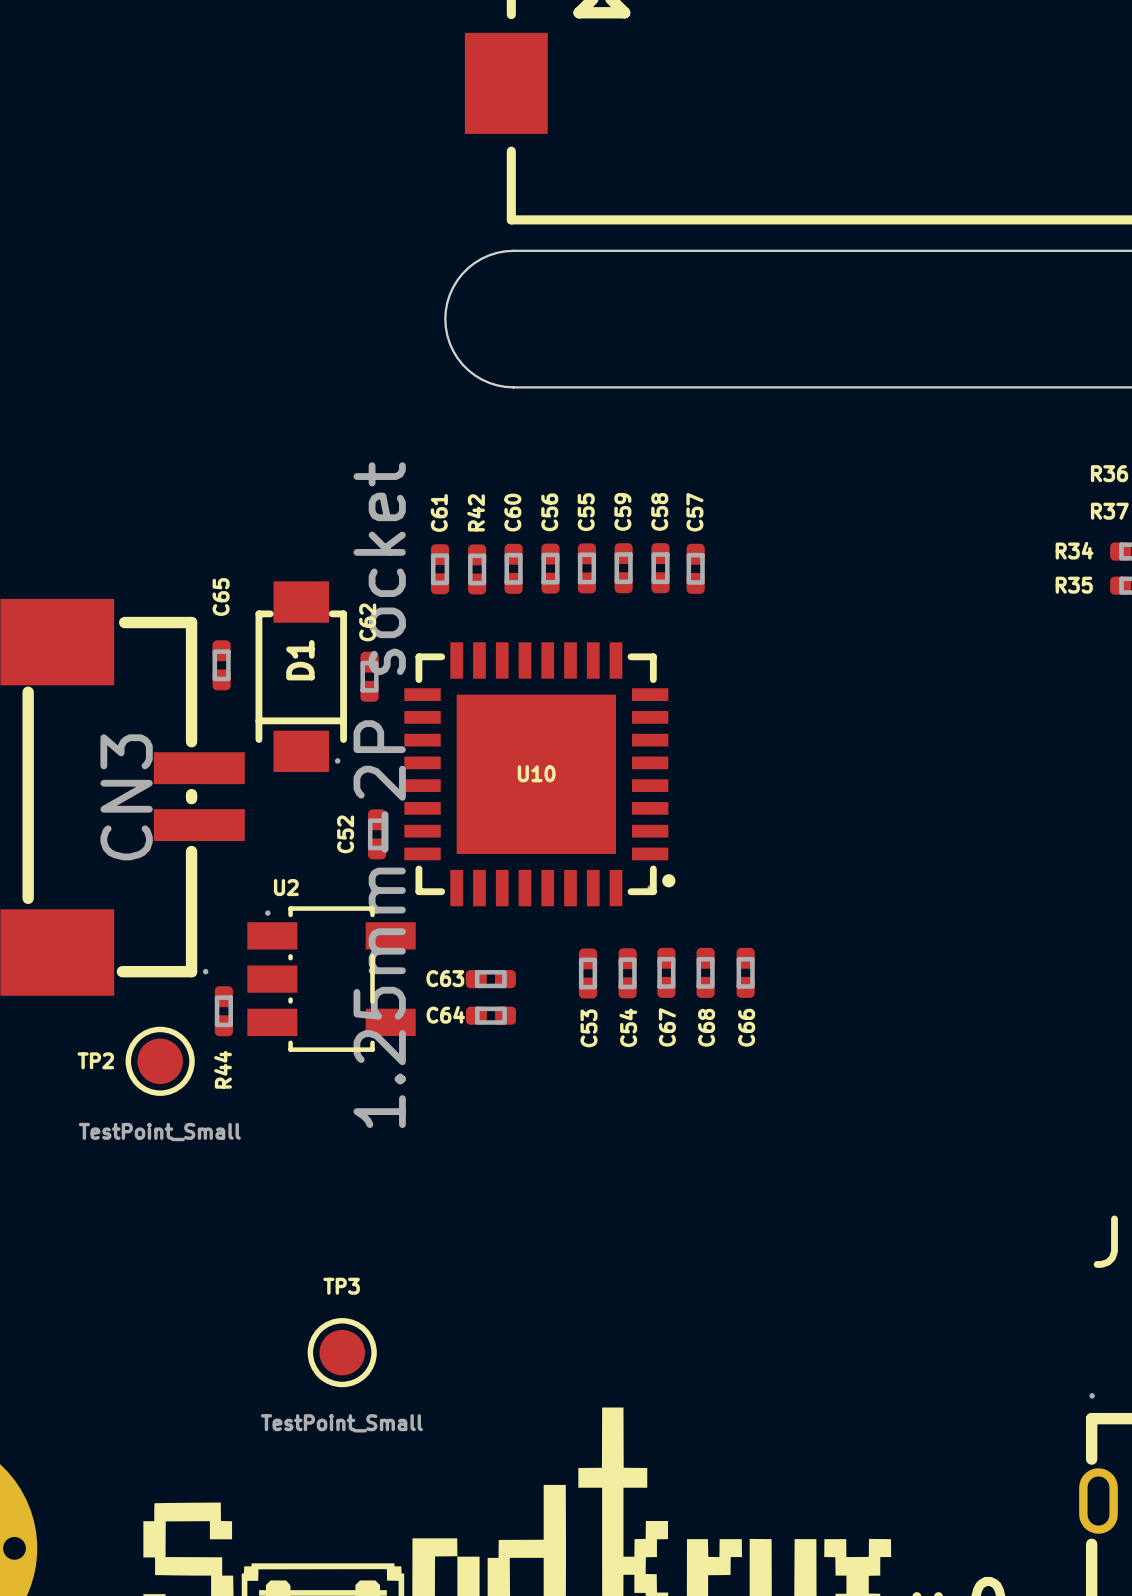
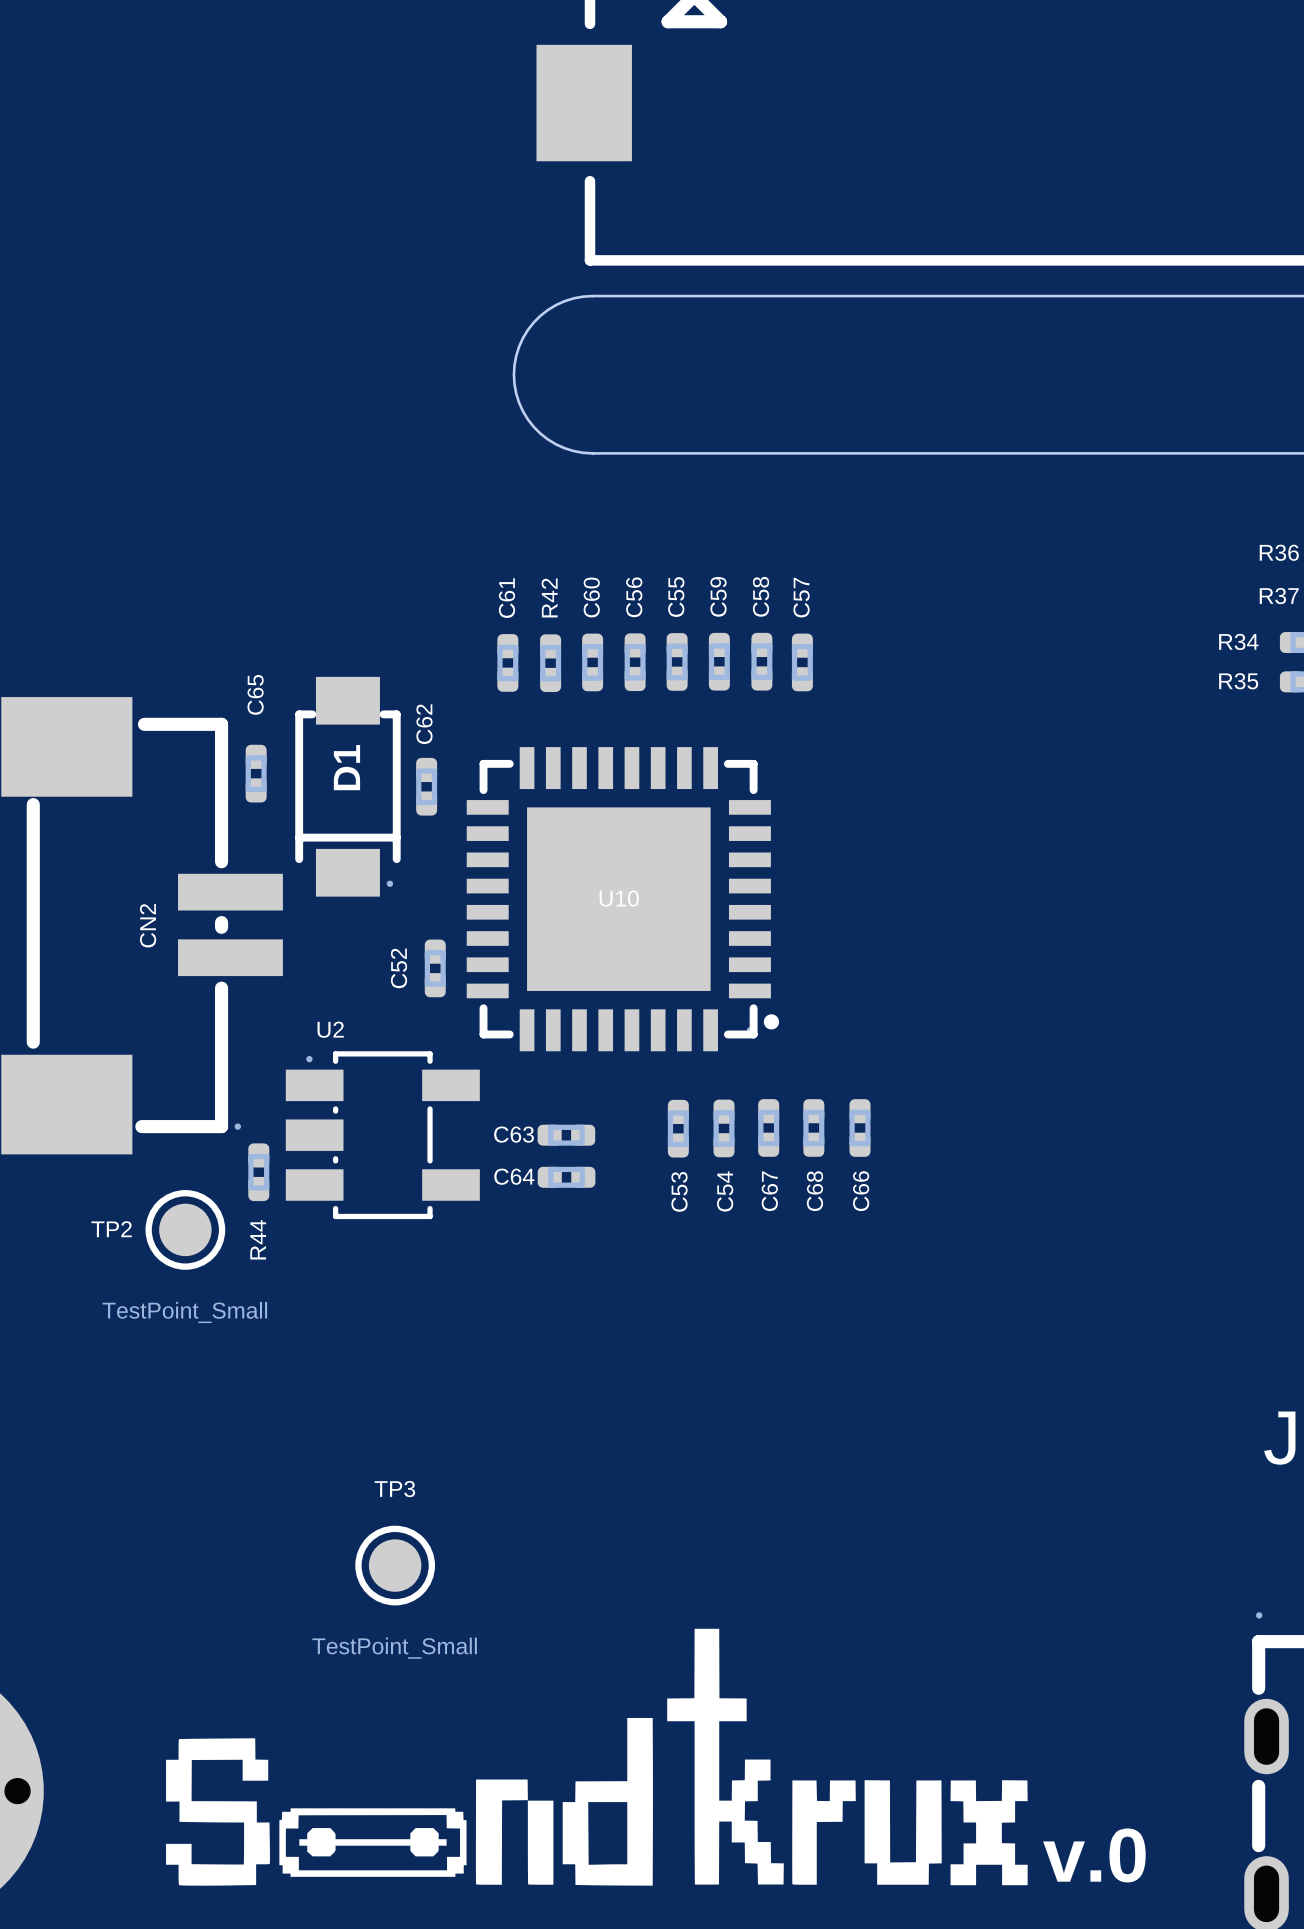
CN3 value: 1.25mm-2P socket (379, 795) -> none
CN3 name: CN3 (126, 797) -> CN2 (148, 925)

